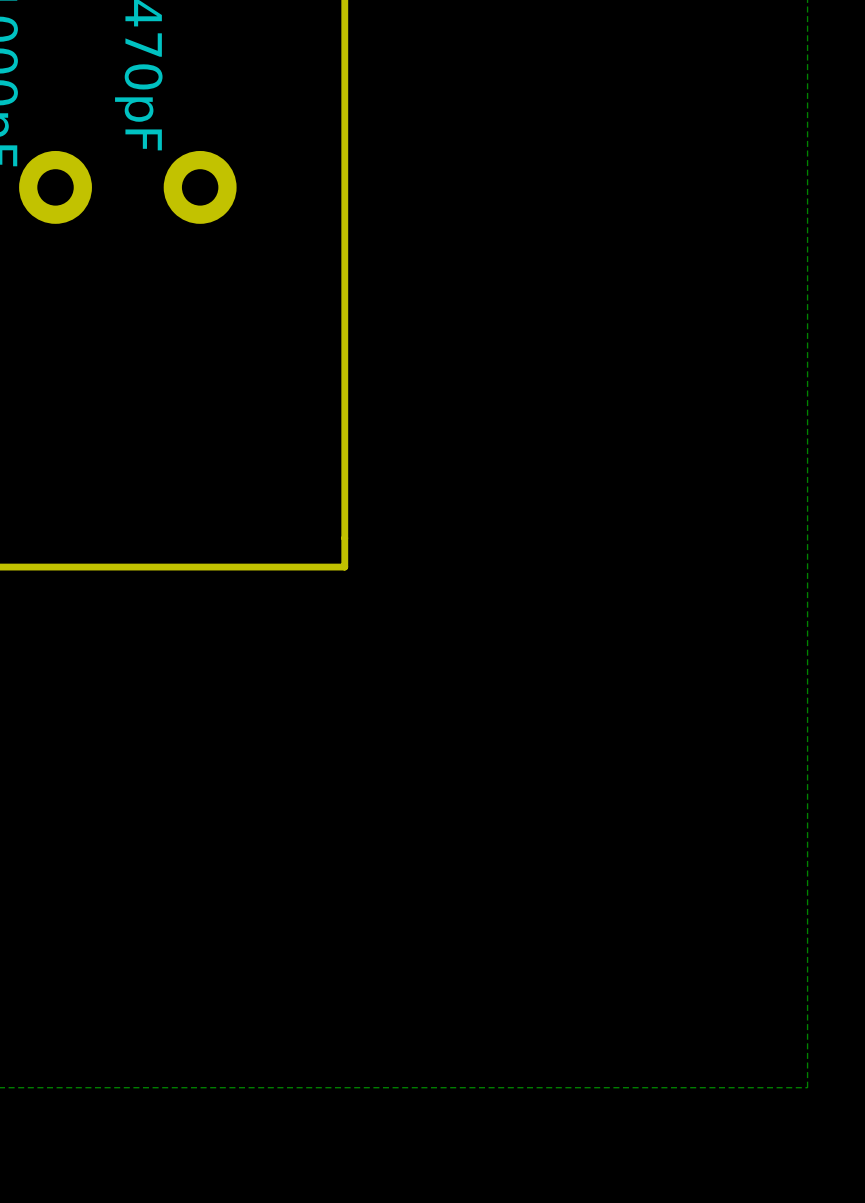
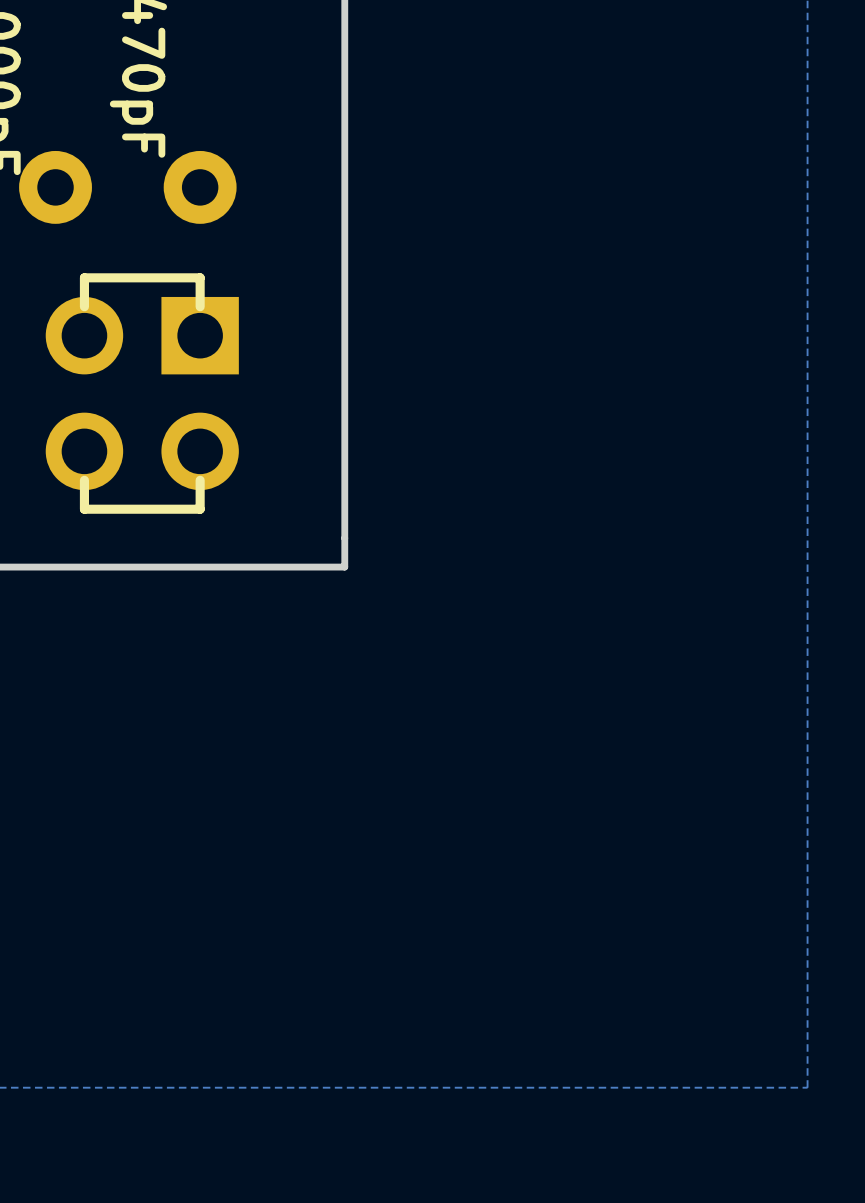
line: none -> (200, 306) (200, 277) (84, 277) (84, 306)
part: none -> (142, 393)
line: none -> (200, 480) (200, 509) (84, 509) (84, 480)

